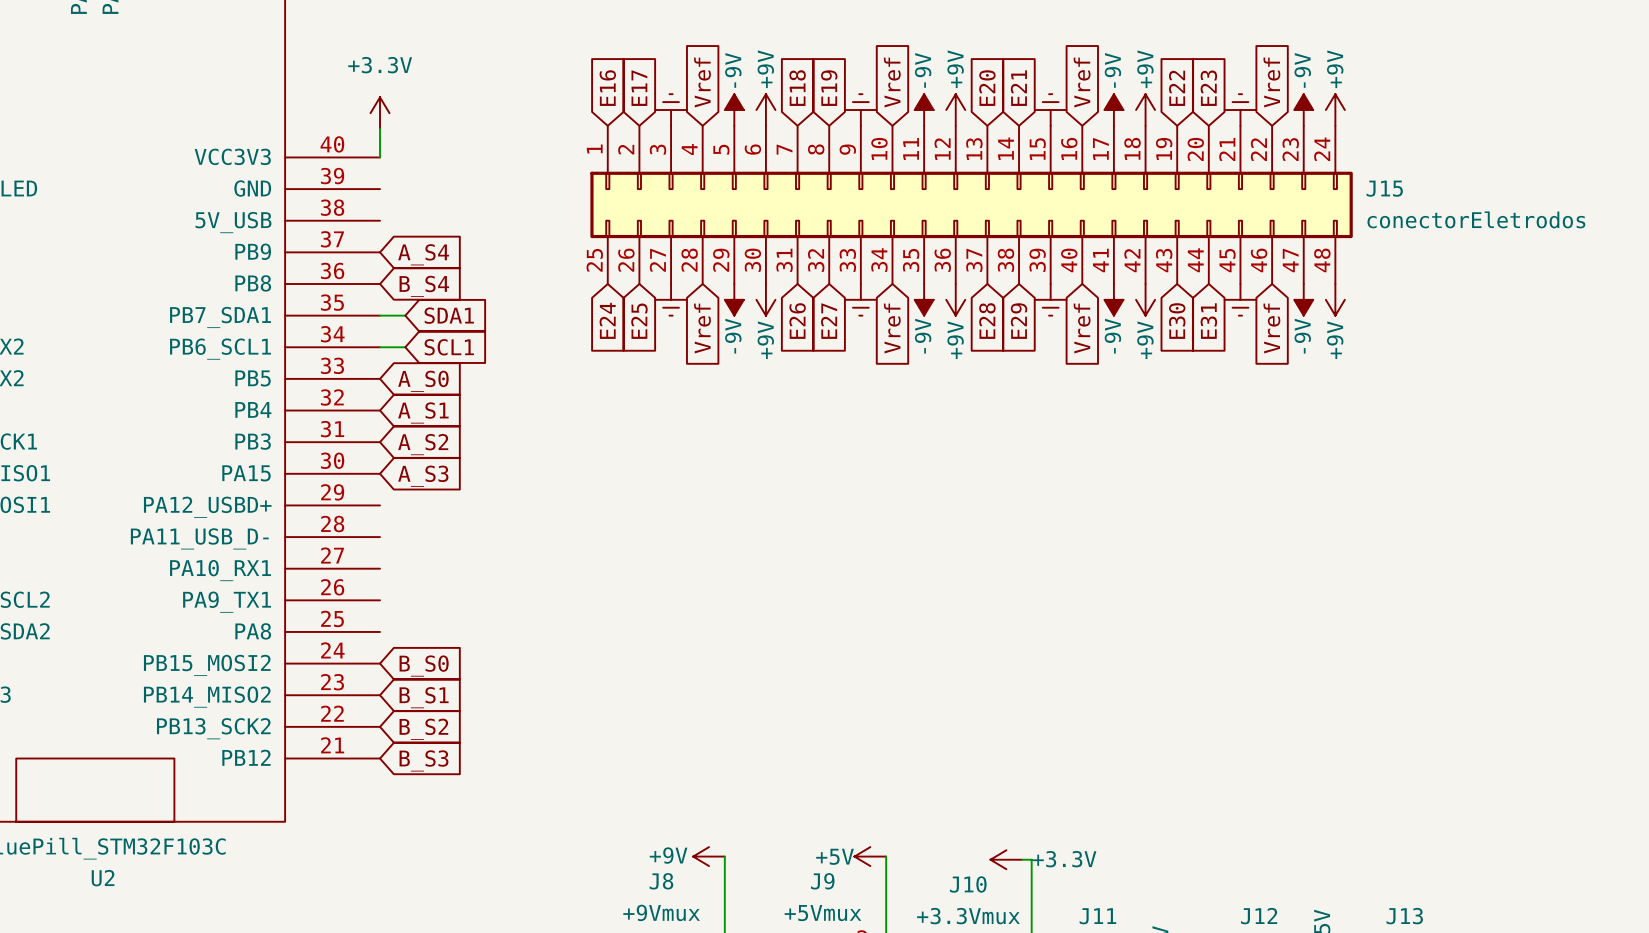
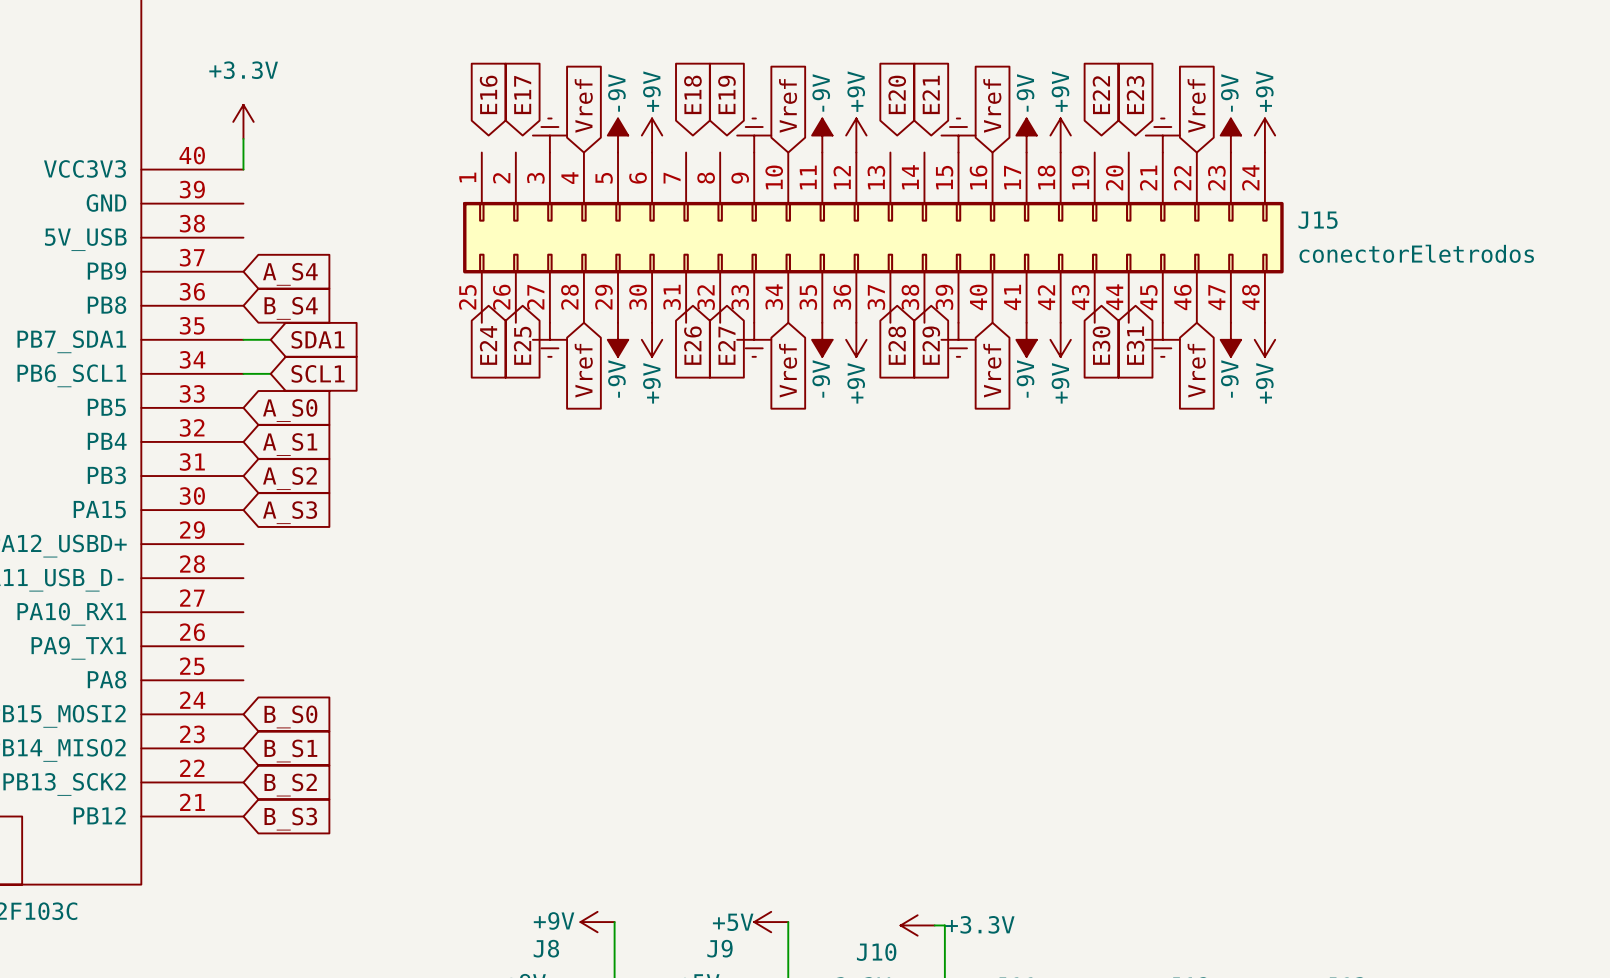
global label position: Vref (702, 82) -> Vref (583, 105)
global label position: Vref (892, 82) -> Vref (788, 105)
global label position: Vref (1082, 82) -> Vref (992, 105)
global label position: Vref (1271, 82) -> Vref (1196, 105)
power symbol position: (671, 110) -> (549, 135)
power symbol position: -9V (734, 110) -> -9V (618, 135)
power symbol position: +9V (765, 110) -> +9V (652, 135)
power symbol position: (860, 110) -> (754, 135)
power symbol position: -9V (924, 110) -> -9V (822, 135)
power symbol position: +9V (955, 110) -> +9V (856, 135)
power symbol position: (1050, 110) -> (958, 135)
power symbol position: -9V (1113, 110) -> -9V (1026, 135)
power symbol position: +9V (1145, 110) -> +9V (1060, 135)
power symbol position: (1240, 110) -> (1162, 135)
power symbol position: -9V (1303, 110) -> -9V (1230, 135)
power symbol position: +9V (1335, 110) -> +9V (1264, 135)
J15 position: (971, 204) -> (873, 237)
power symbol position: (671, 299) -> (549, 339)
power symbol position: -9V (734, 299) -> -9V (618, 339)
power symbol position: +9V (765, 299) -> +9V (652, 339)
power symbol position: (860, 299) -> (754, 339)
power symbol position: -9V (924, 299) -> -9V (822, 339)
power symbol position: +9V (955, 299) -> +9V (856, 339)
power symbol position: (1050, 299) -> (958, 339)
power symbol position: -9V (1113, 299) -> -9V (1026, 339)
power symbol position: +9V (1145, 299) -> +9V (1060, 339)
power symbol position: (1240, 299) -> (1162, 339)
power symbol position: -9V (1303, 299) -> -9V (1230, 339)
power symbol position: +9V (1335, 299) -> +9V (1264, 339)
global label position: Vref (702, 328) -> Vref (583, 370)
global label position: Vref (892, 328) -> Vref (788, 370)
global label position: Vref (1082, 328) -> Vref (992, 370)
global label position: Vref (1271, 328) -> Vref (1196, 370)

